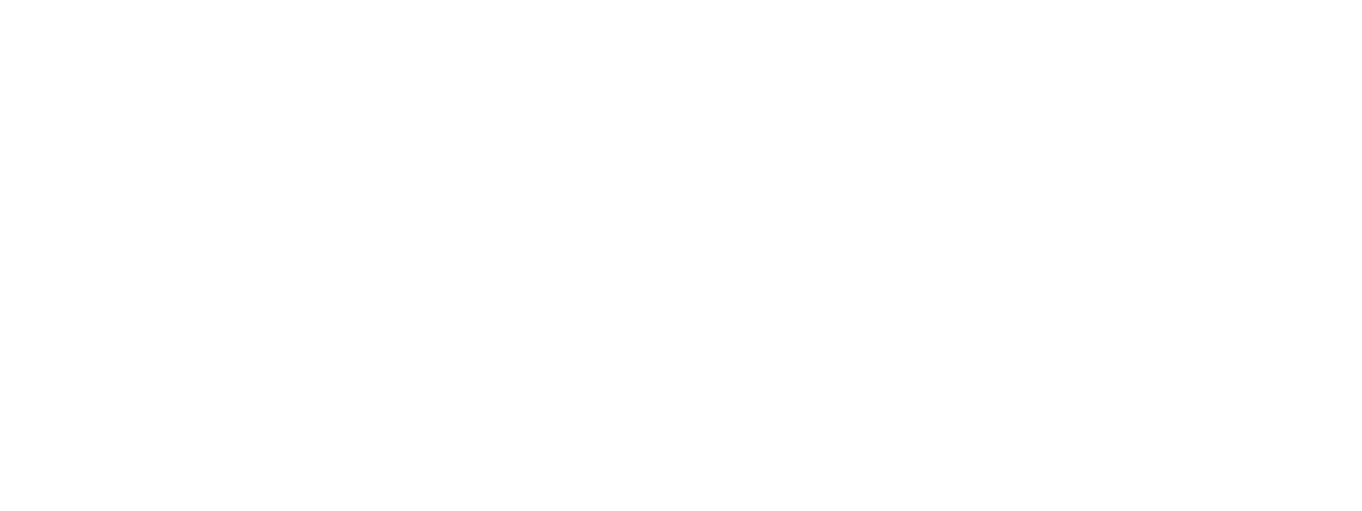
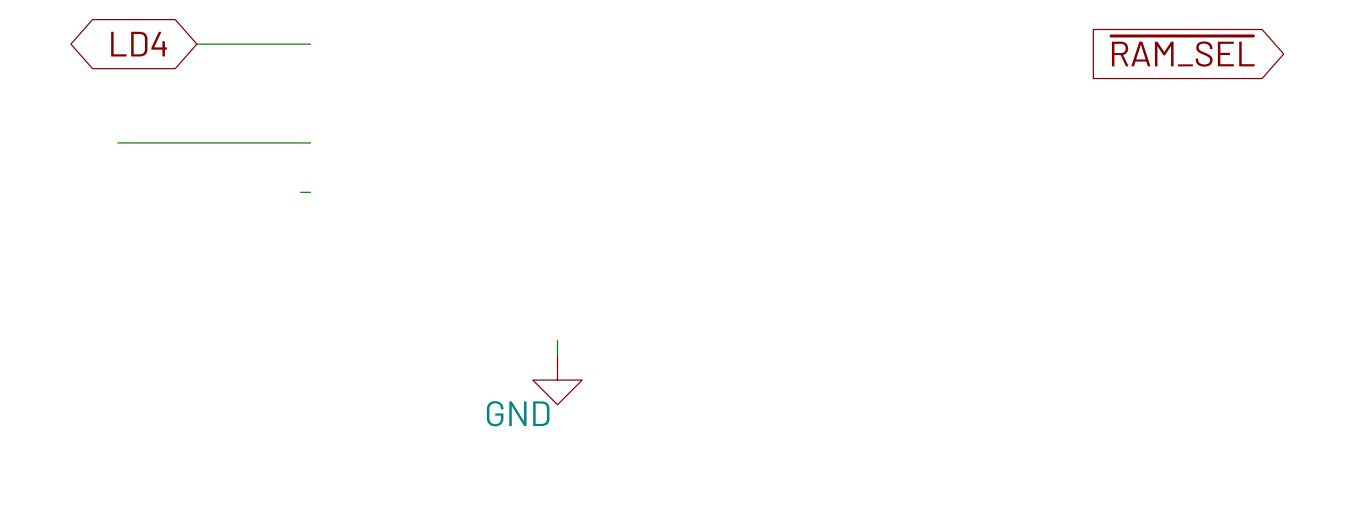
global label: none -> LD4 (139, 44)
wire: none -> (196, 44) (310, 44)
global label: none -> ~{RAM_SEL} (1182, 51)
wire: none -> (117, 142) (310, 142)
wire: none -> (300, 192) (310, 192)
wire: none -> (557, 340) (557, 355)
power symbol: none -> GND (557, 380)

